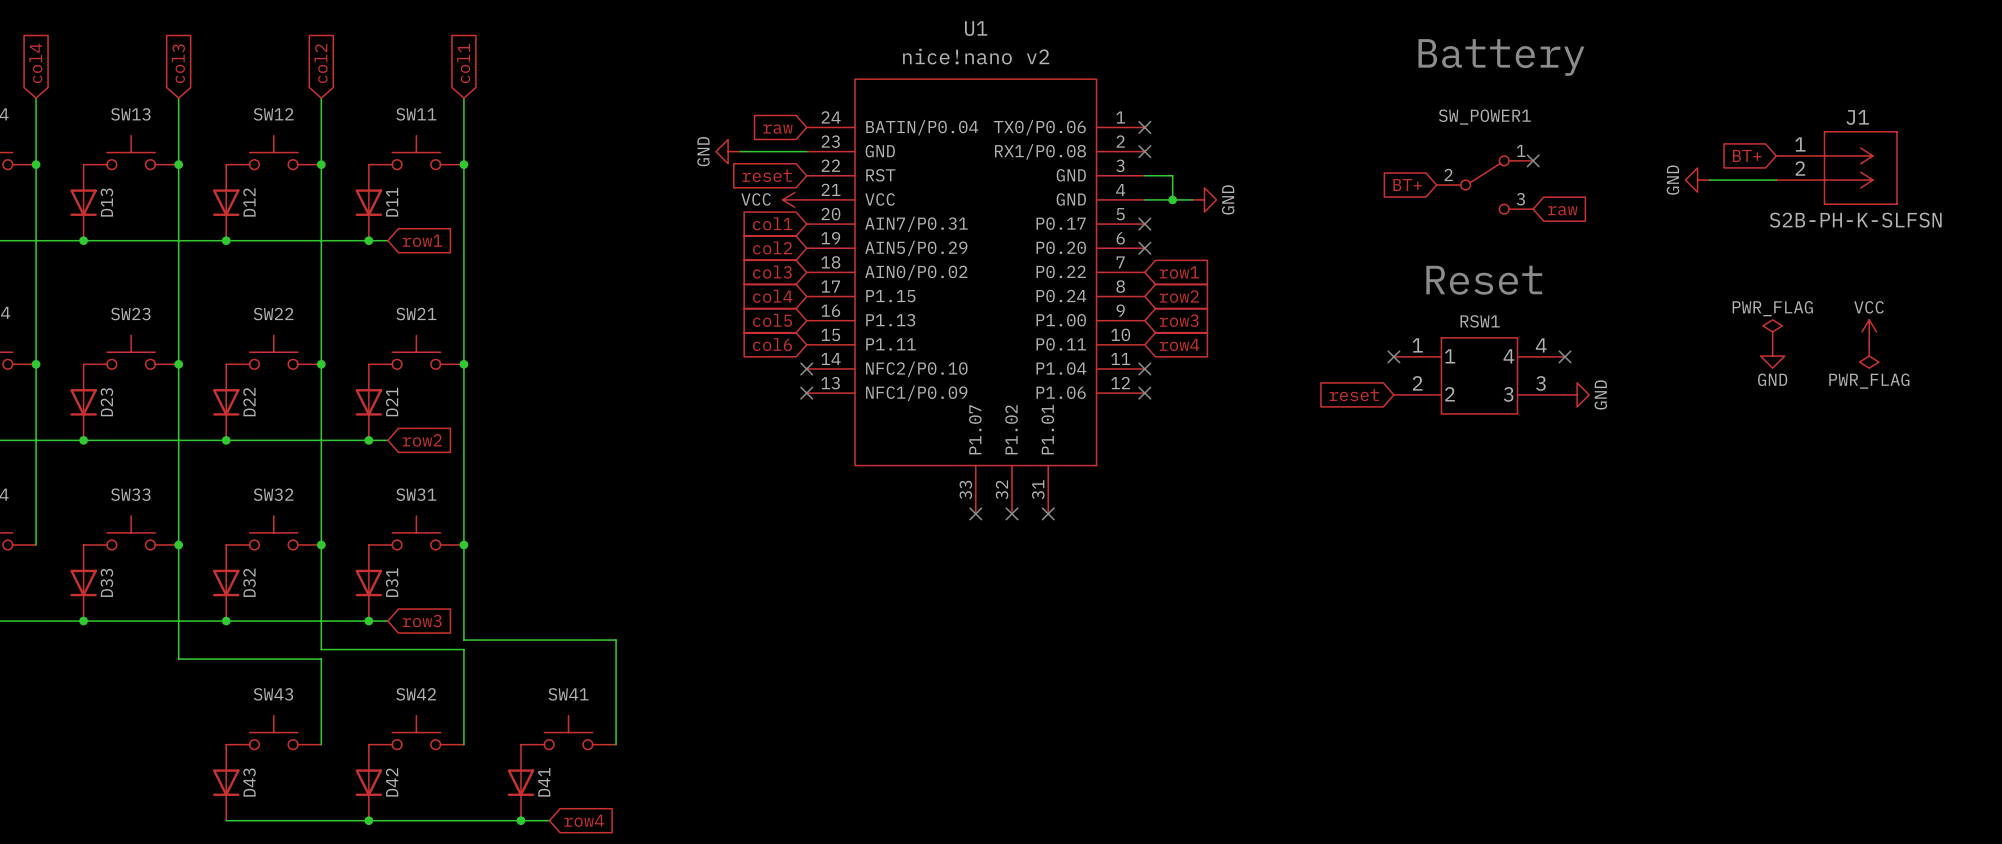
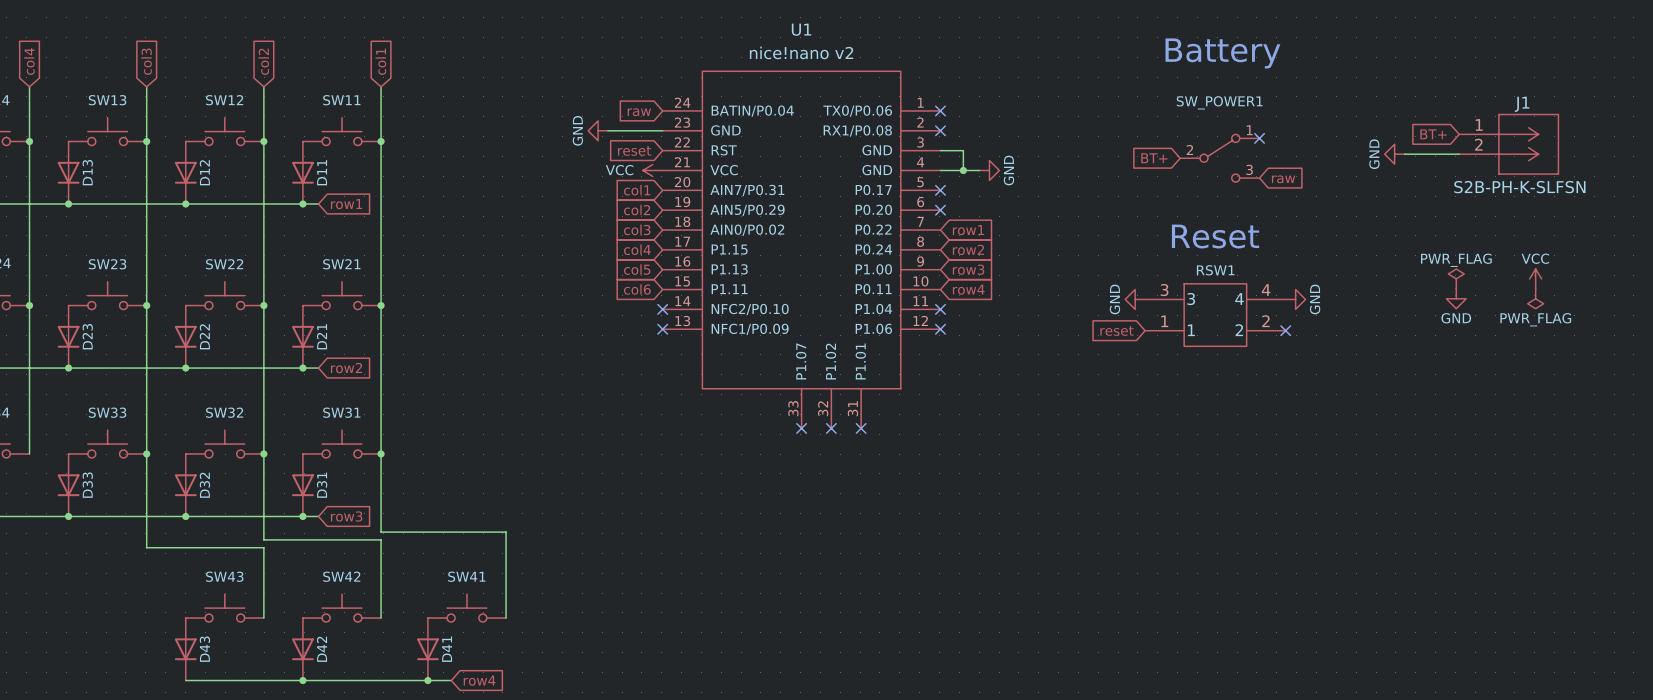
RSW1 pin number: 1 (1417, 345) -> 3 (1164, 290)
power symbol: none -> GND (1135, 299)
no-connect mark: (1393, 356) -> none
RSW1 pin name: 1 (1450, 356) -> 3 (1191, 299)
no-connect mark position: (1565, 356) -> (1285, 330)
RSW1 pin number: 2 (1417, 383) -> 1 (1164, 321)
RSW1 pin number: 3 (1540, 383) -> 2 (1265, 321)
RSW1 pin name: 2 (1449, 394) -> 1 (1191, 330)
RSW1 pin name: 3 (1508, 394) -> 2 (1239, 330)
power symbol position: GND (1577, 394) -> GND (1295, 299)

